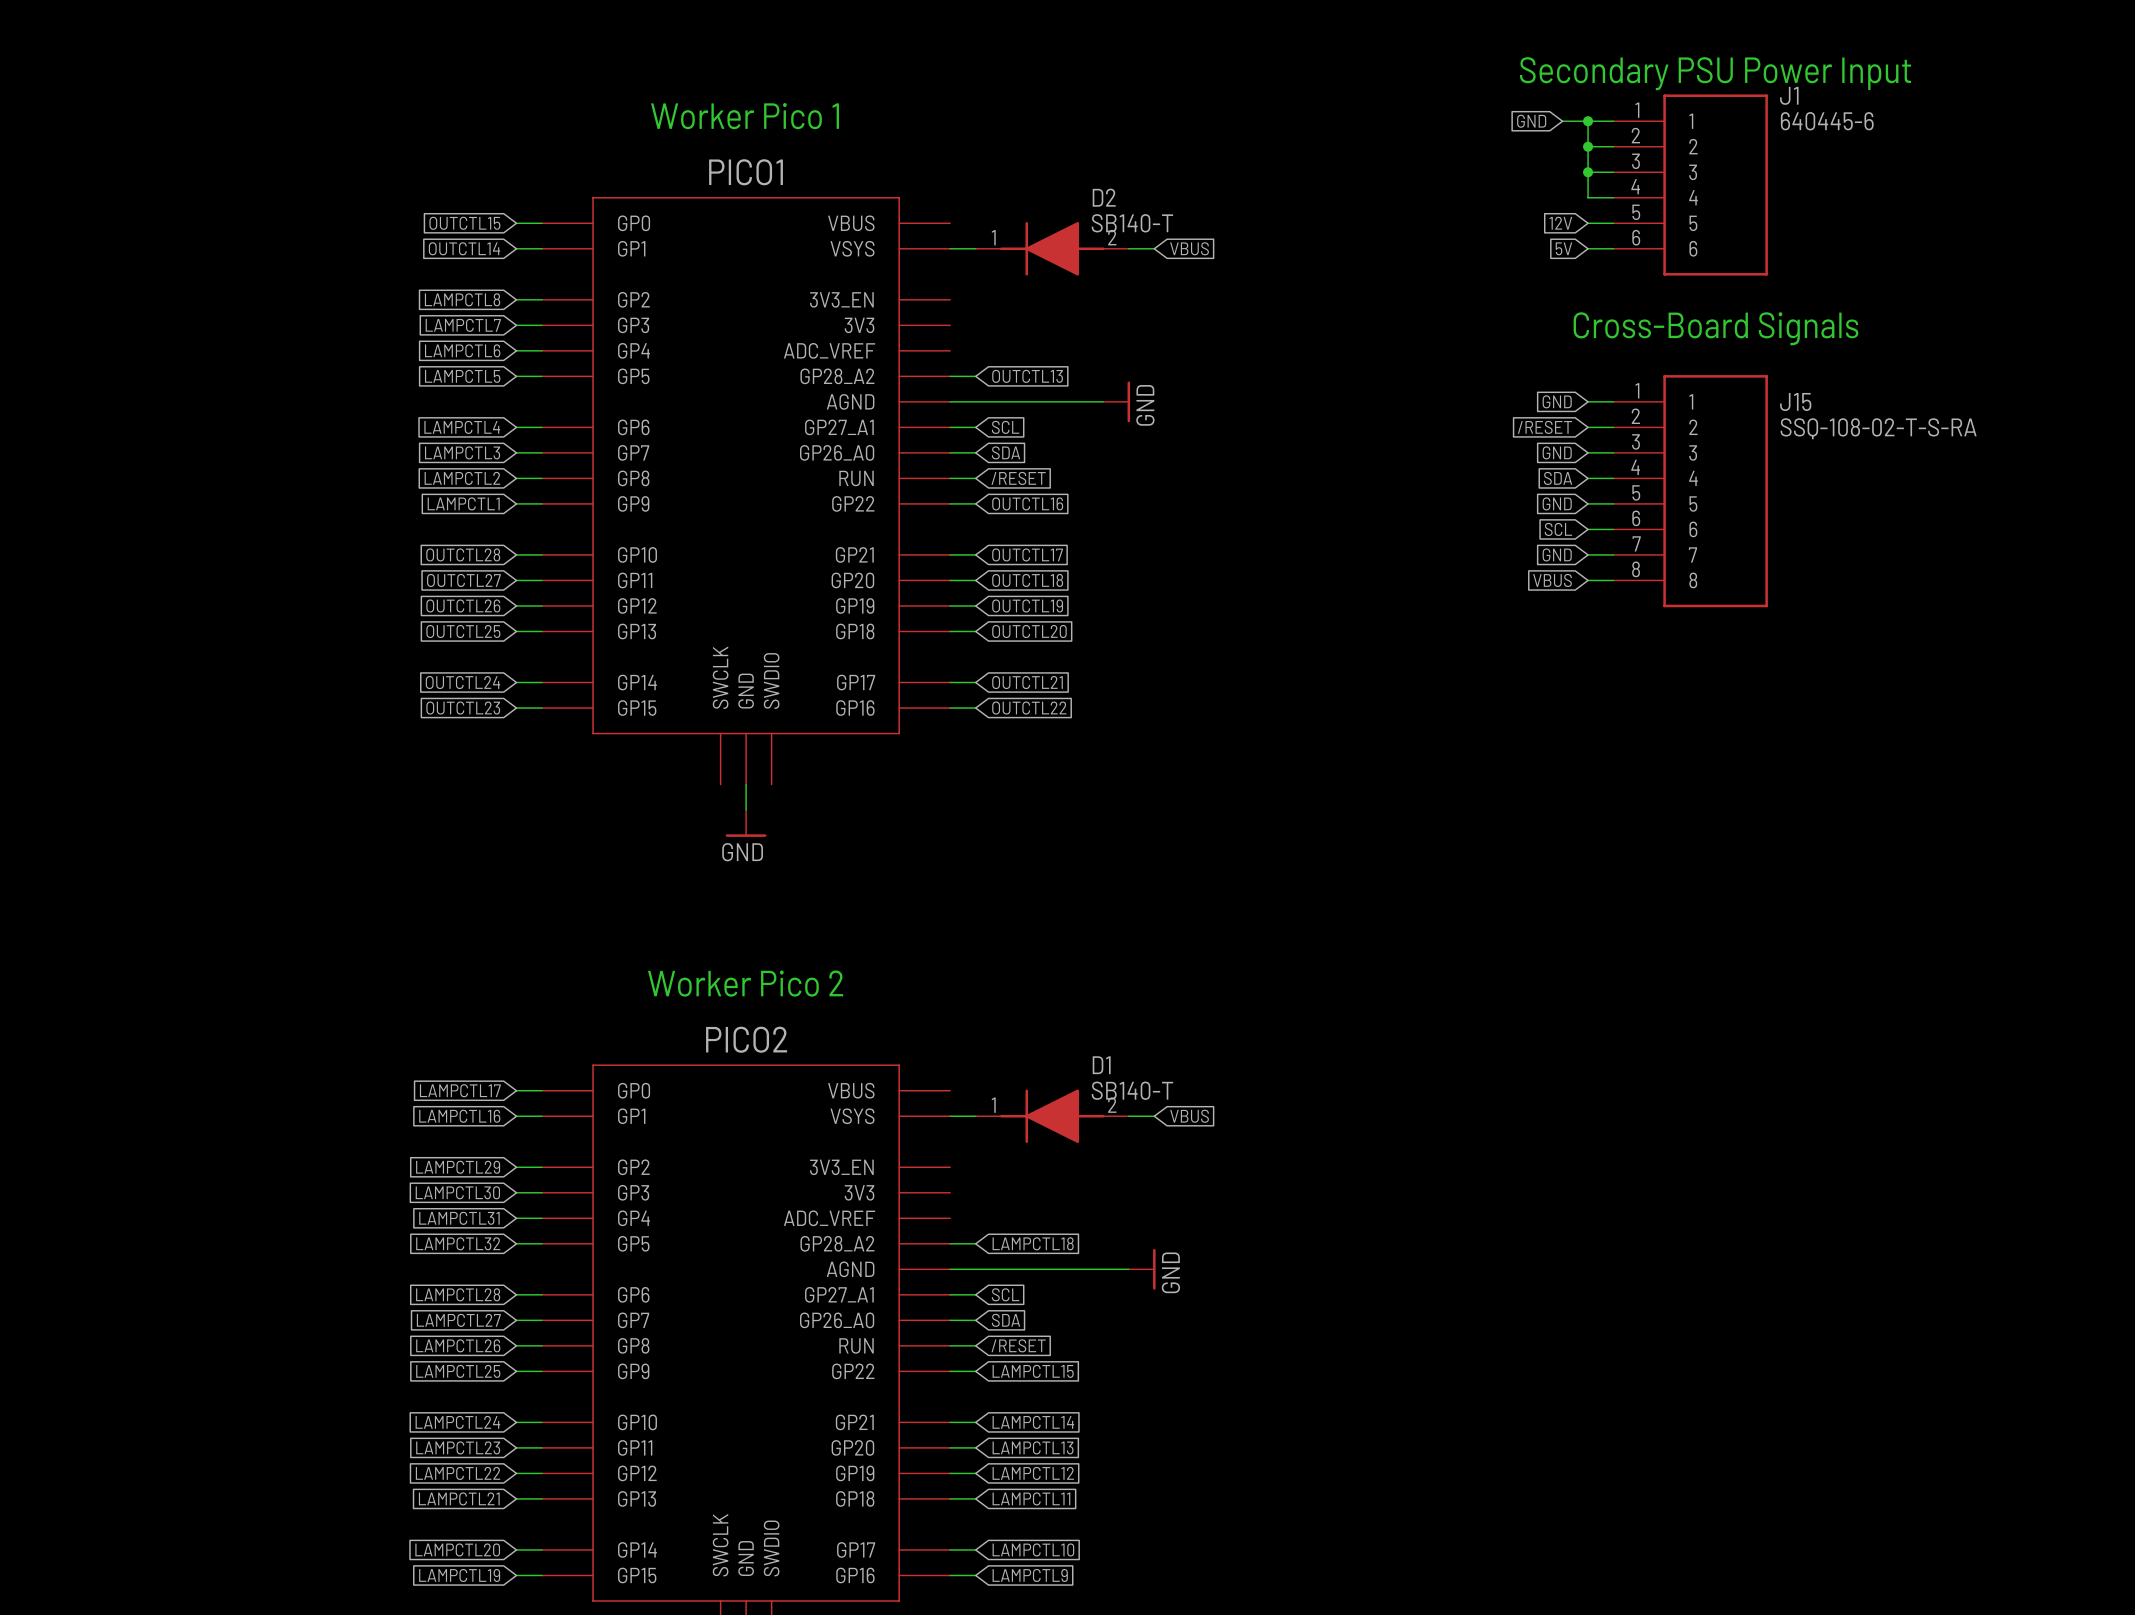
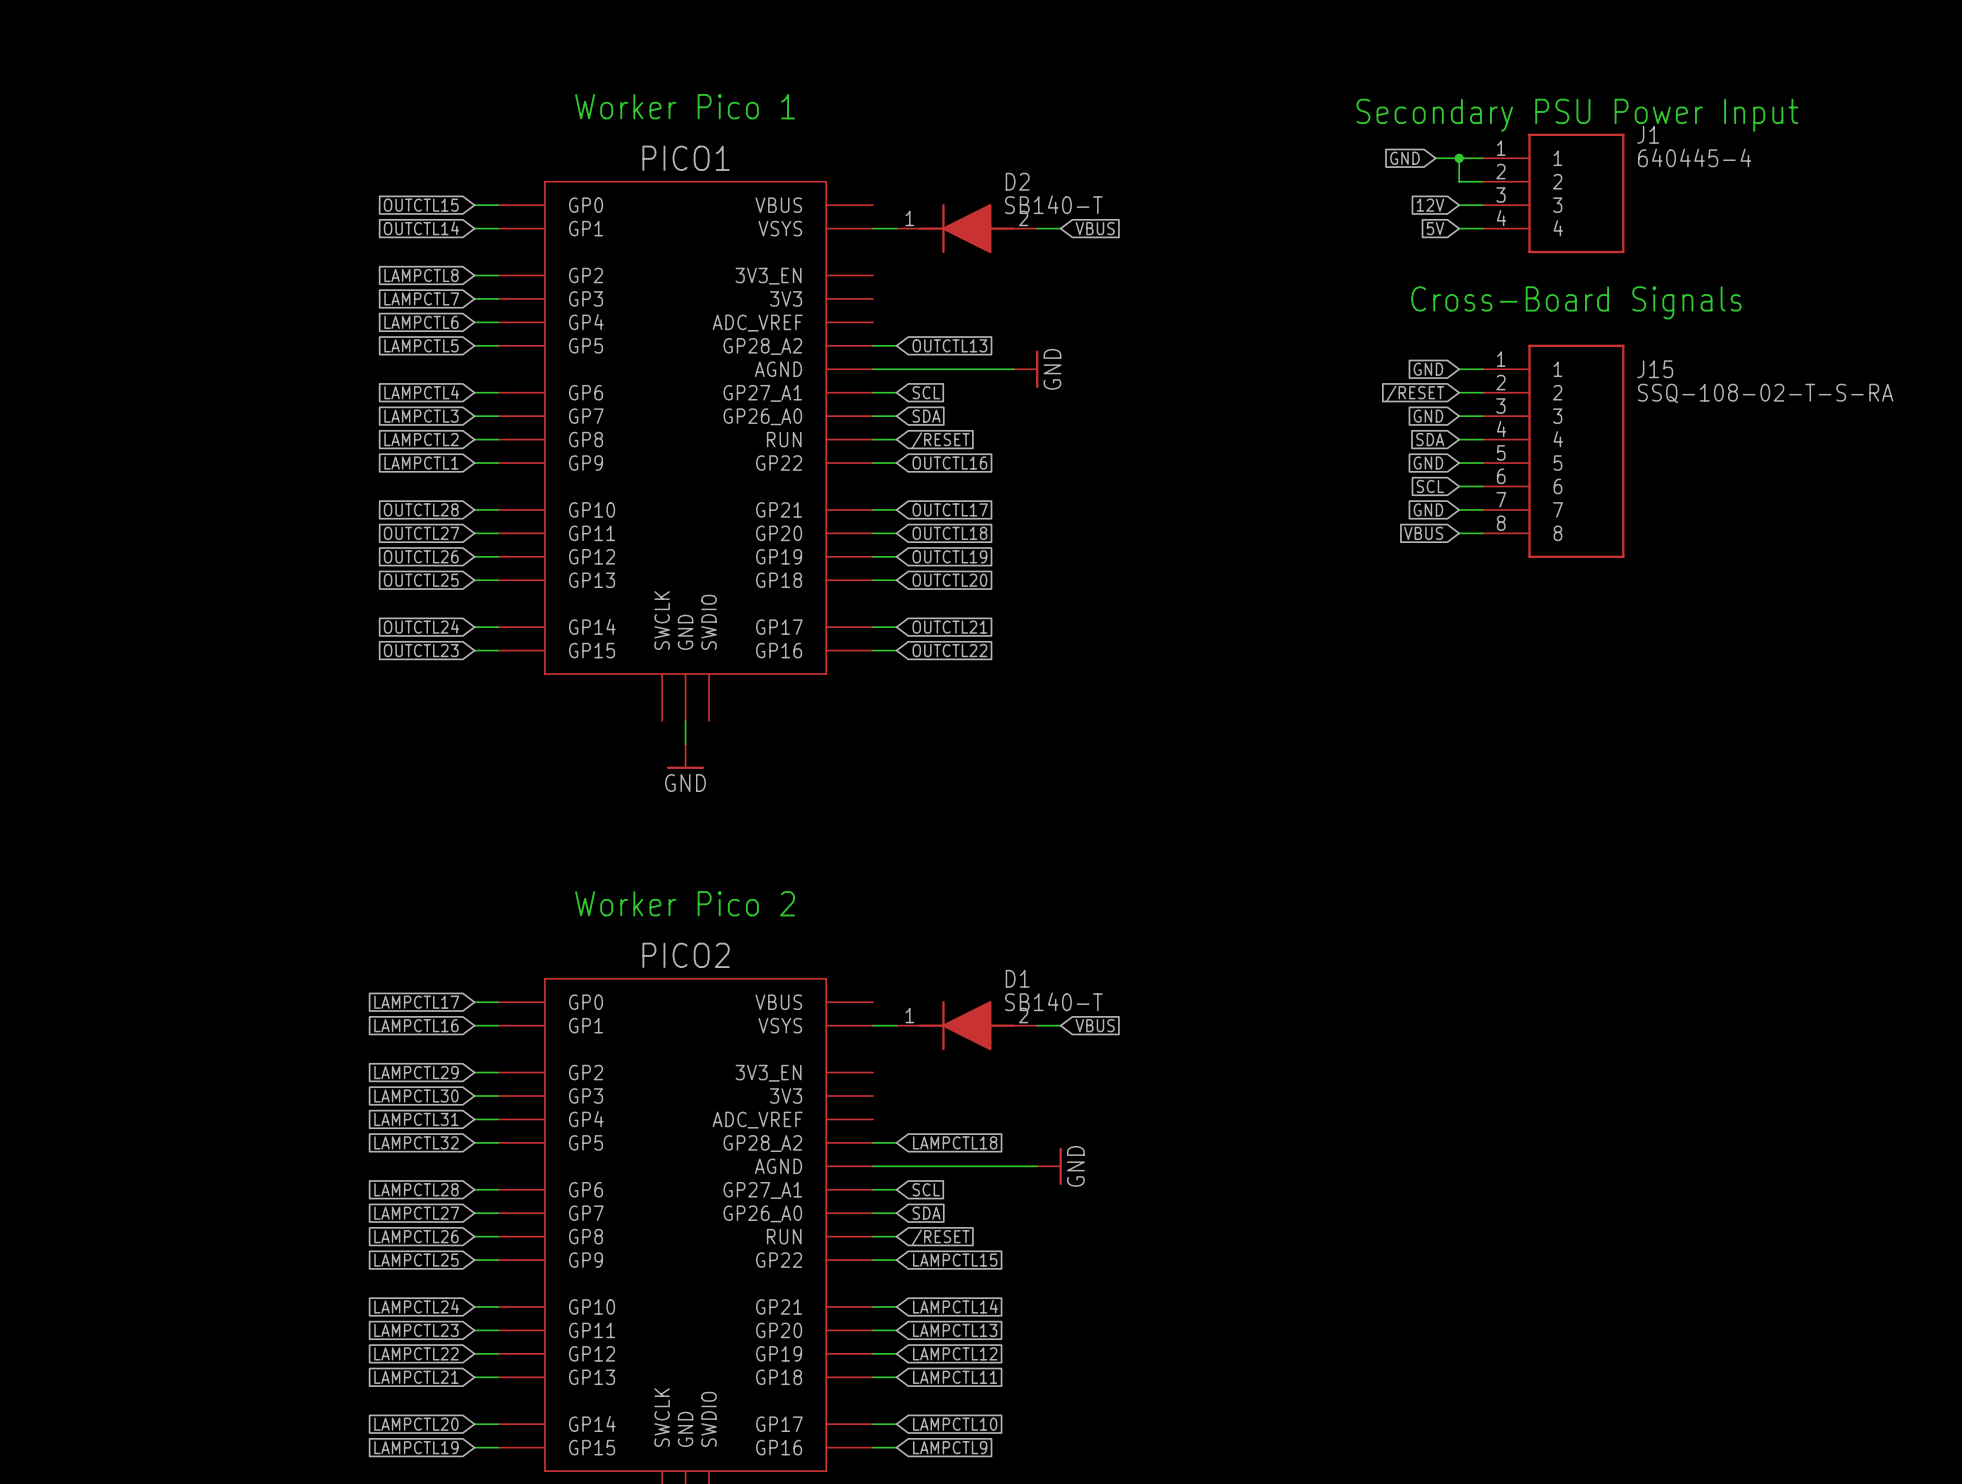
text position: Secondary PSU Power Input (1715, 73) -> Secondary PSU Power Input (1577, 115)
J1 symbol: [1613, 94, 1768, 276] -> [1482, 133, 1625, 254]
J1 name position: J1 (1789, 95) -> J1 (1648, 134)
global label position: GND (1531, 121) -> GND (1404, 158)
wire: (1562, 121) (1613, 121) -> none
wire: (1588, 121) (1588, 172) -> (1435, 158) (1459, 158)
junction: (1588, 121) -> none
J1 value: 640445-6 (1827, 121) -> 640445-4 (1694, 157)
wire: (1588, 146) (1613, 146) -> none
junction: (1588, 146) -> none

